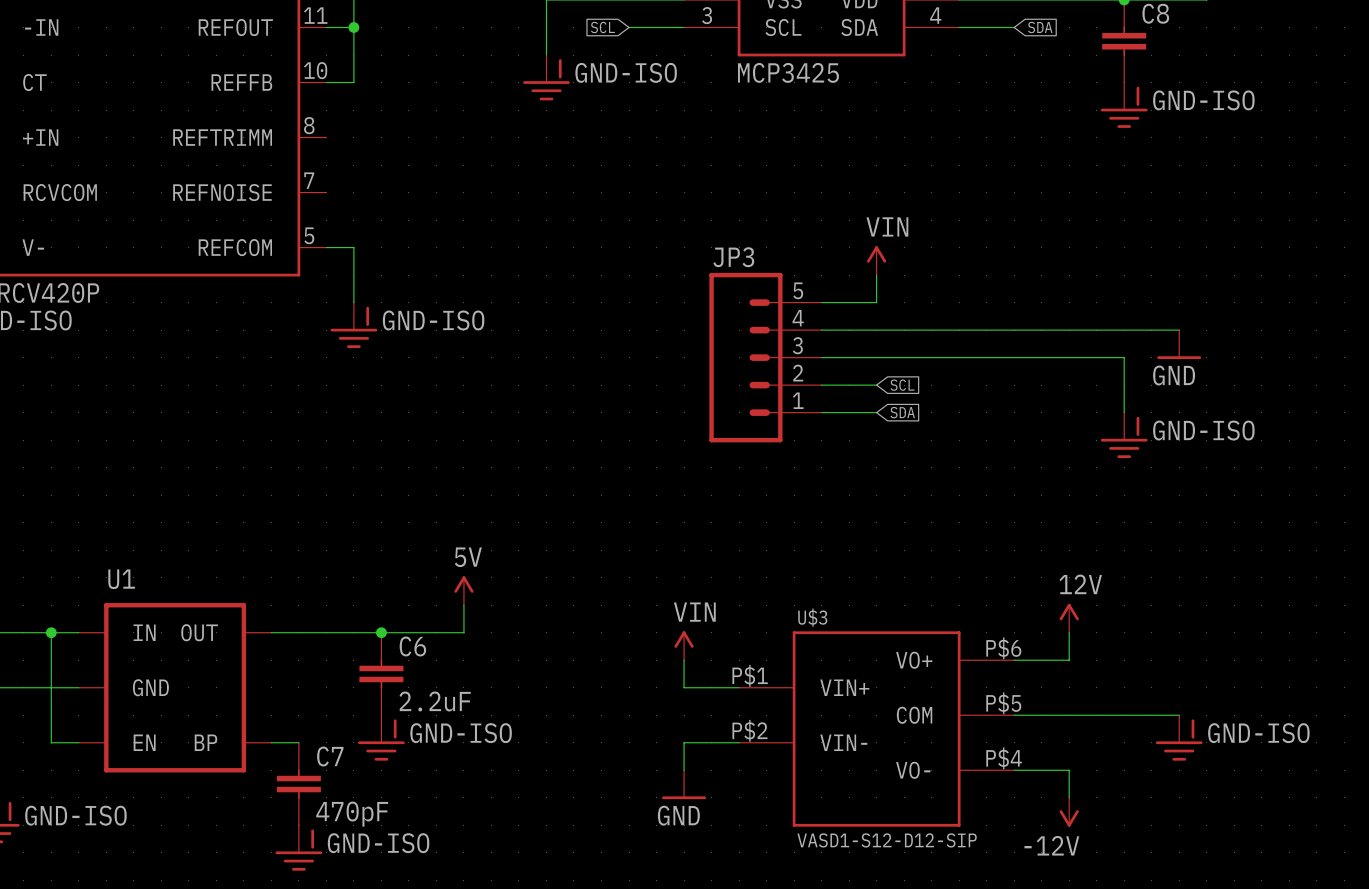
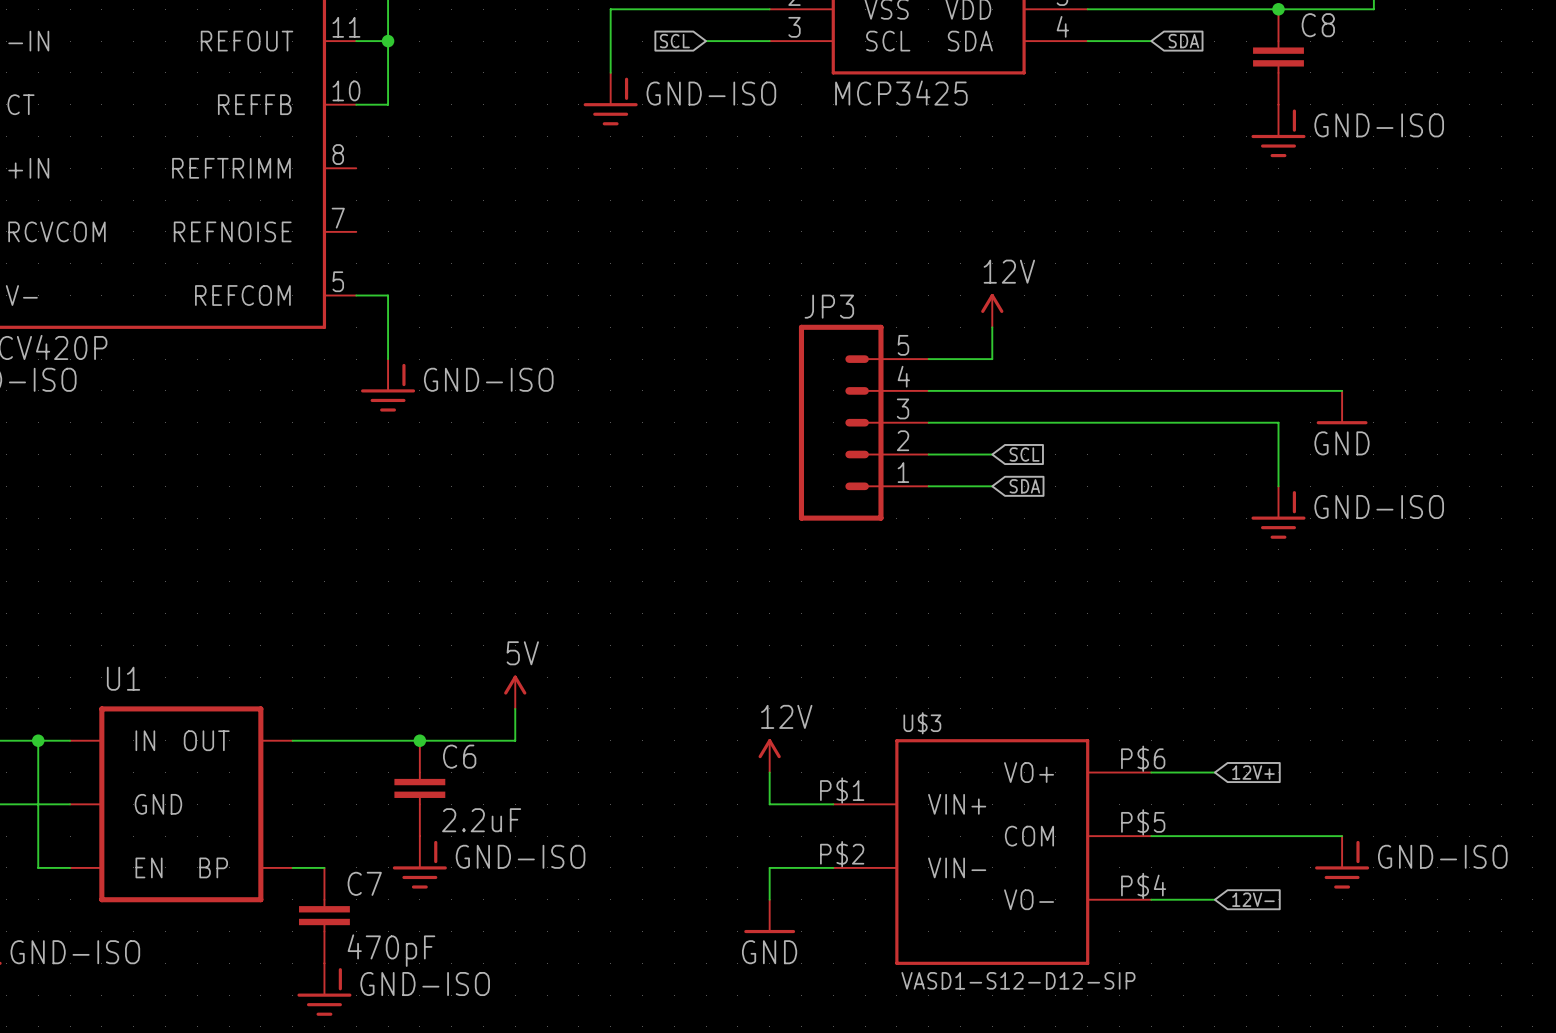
power symbol: VIN (876, 260) -> 12V (992, 310)
power symbol: 12V (1069, 618) -> none
wire: (1069, 632) (1069, 660) -> none
power symbol: VIN (684, 645) -> 12V (769, 755)
global label: none -> 12V+ (1253, 772)
wire: (1069, 770) (1069, 797) -> none
global label: none -> 12V- (1253, 899)
power symbol: -12V (1069, 812) -> none

